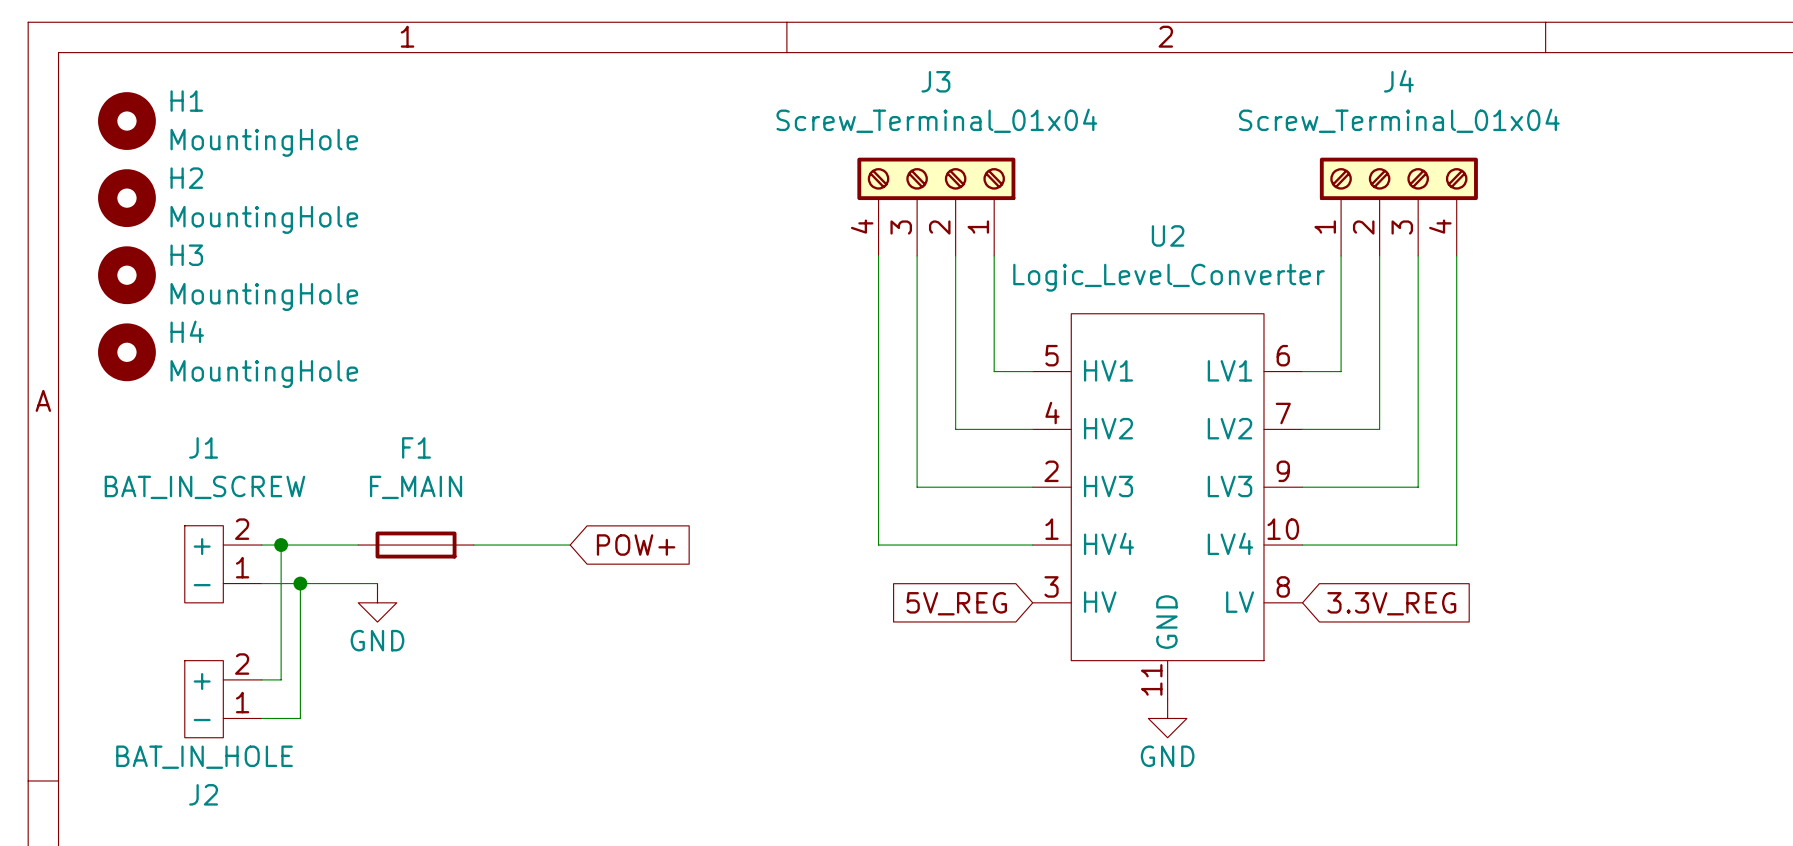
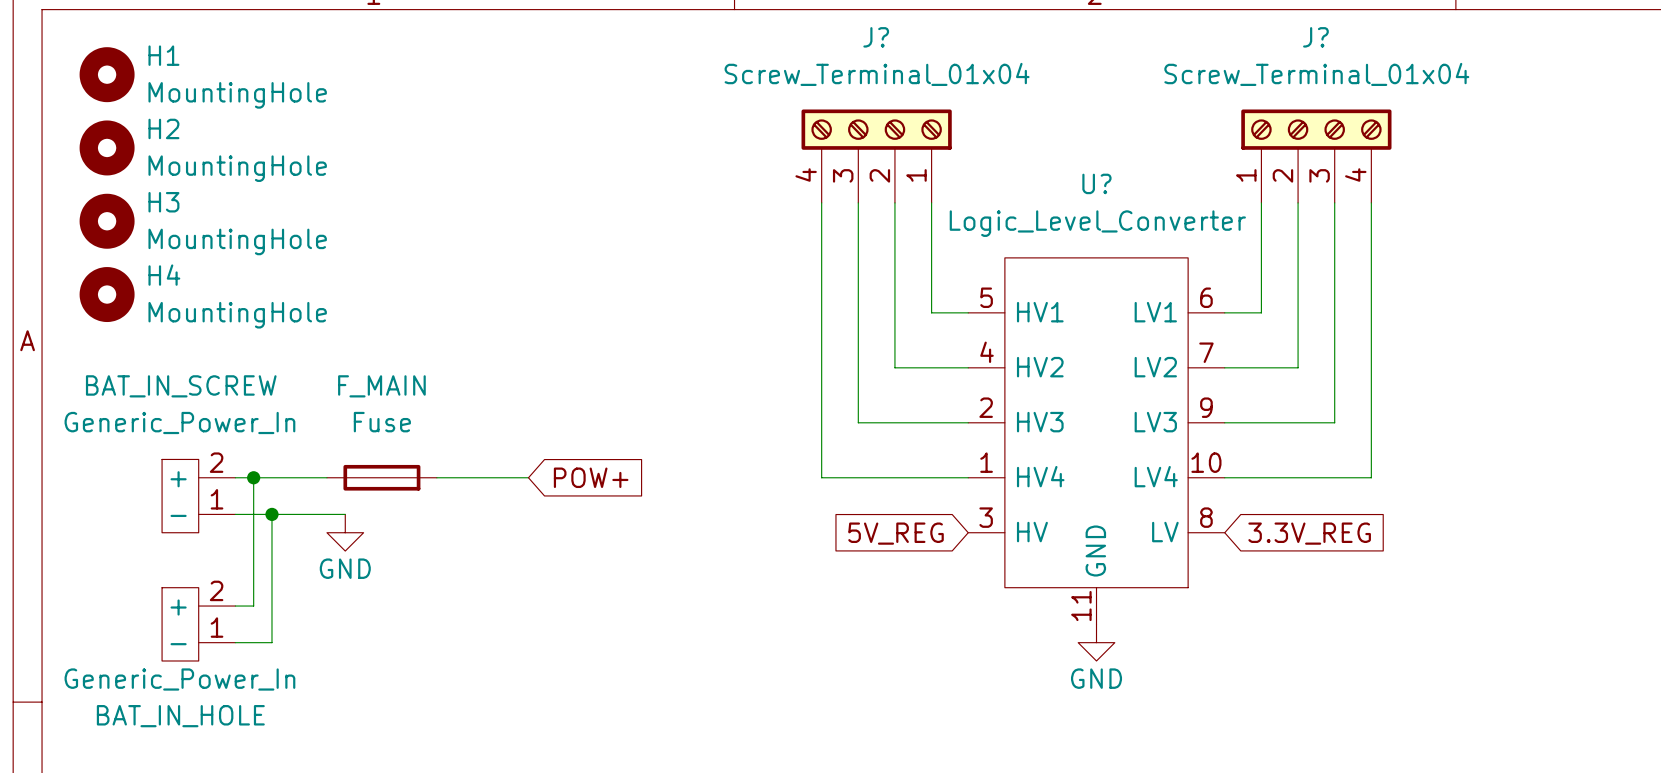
J3 name: J3 (935, 81) -> J? (876, 37)
J4 name: J4 (1398, 81) -> J? (1315, 37)
U2 name: U2 (1168, 235) -> U? (1096, 183)
J1 name: J1 (203, 447) -> BAT_IN_SCREW (181, 386)
F1 name: F1 (416, 447) -> F_MAIN (381, 386)
J1 value: BAT_IN_SCREW (204, 487) -> Generic_Power_In (179, 422)
F1 value: F_MAIN (416, 487) -> Fuse (382, 422)
J2 value: BAT_IN_HOLE (204, 757) -> Generic_Power_In (179, 679)
J2 name: J2 (203, 794) -> BAT_IN_HOLE (180, 716)

